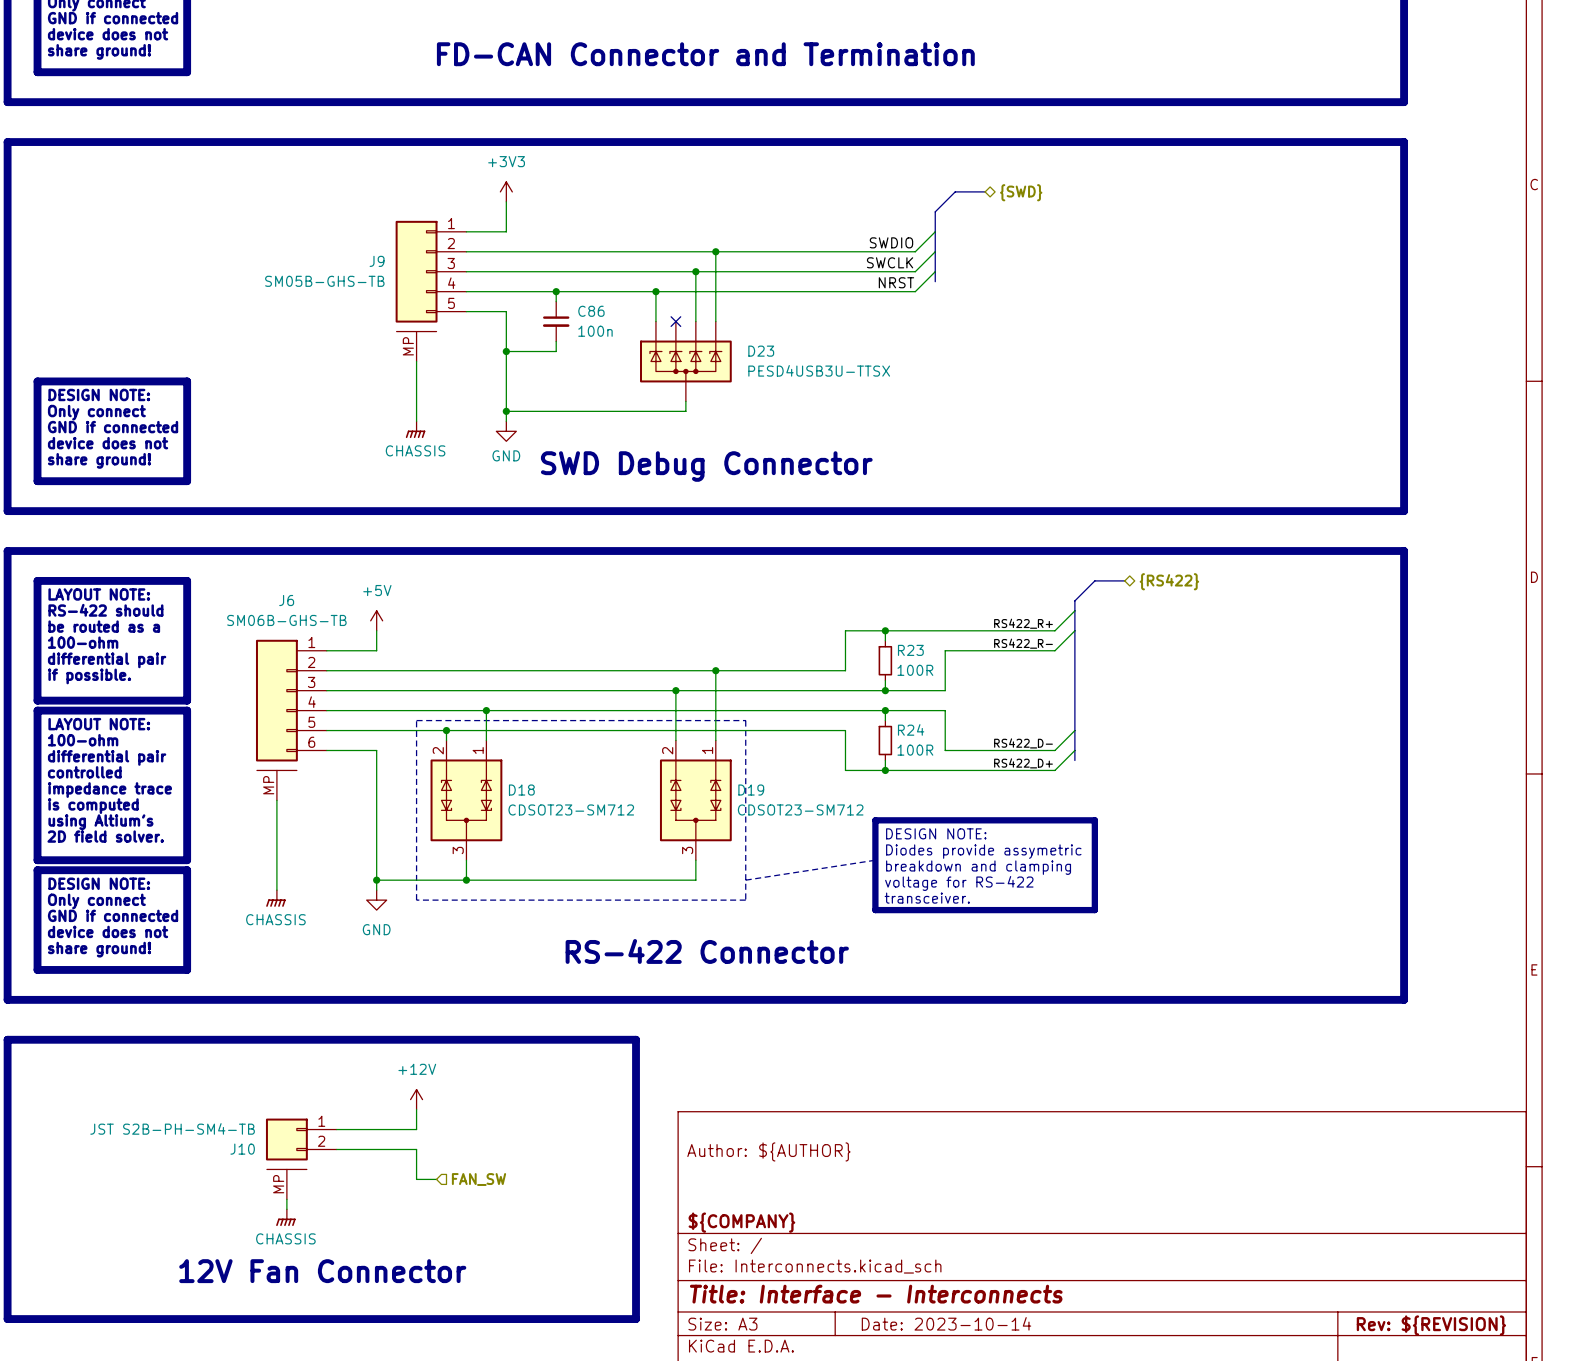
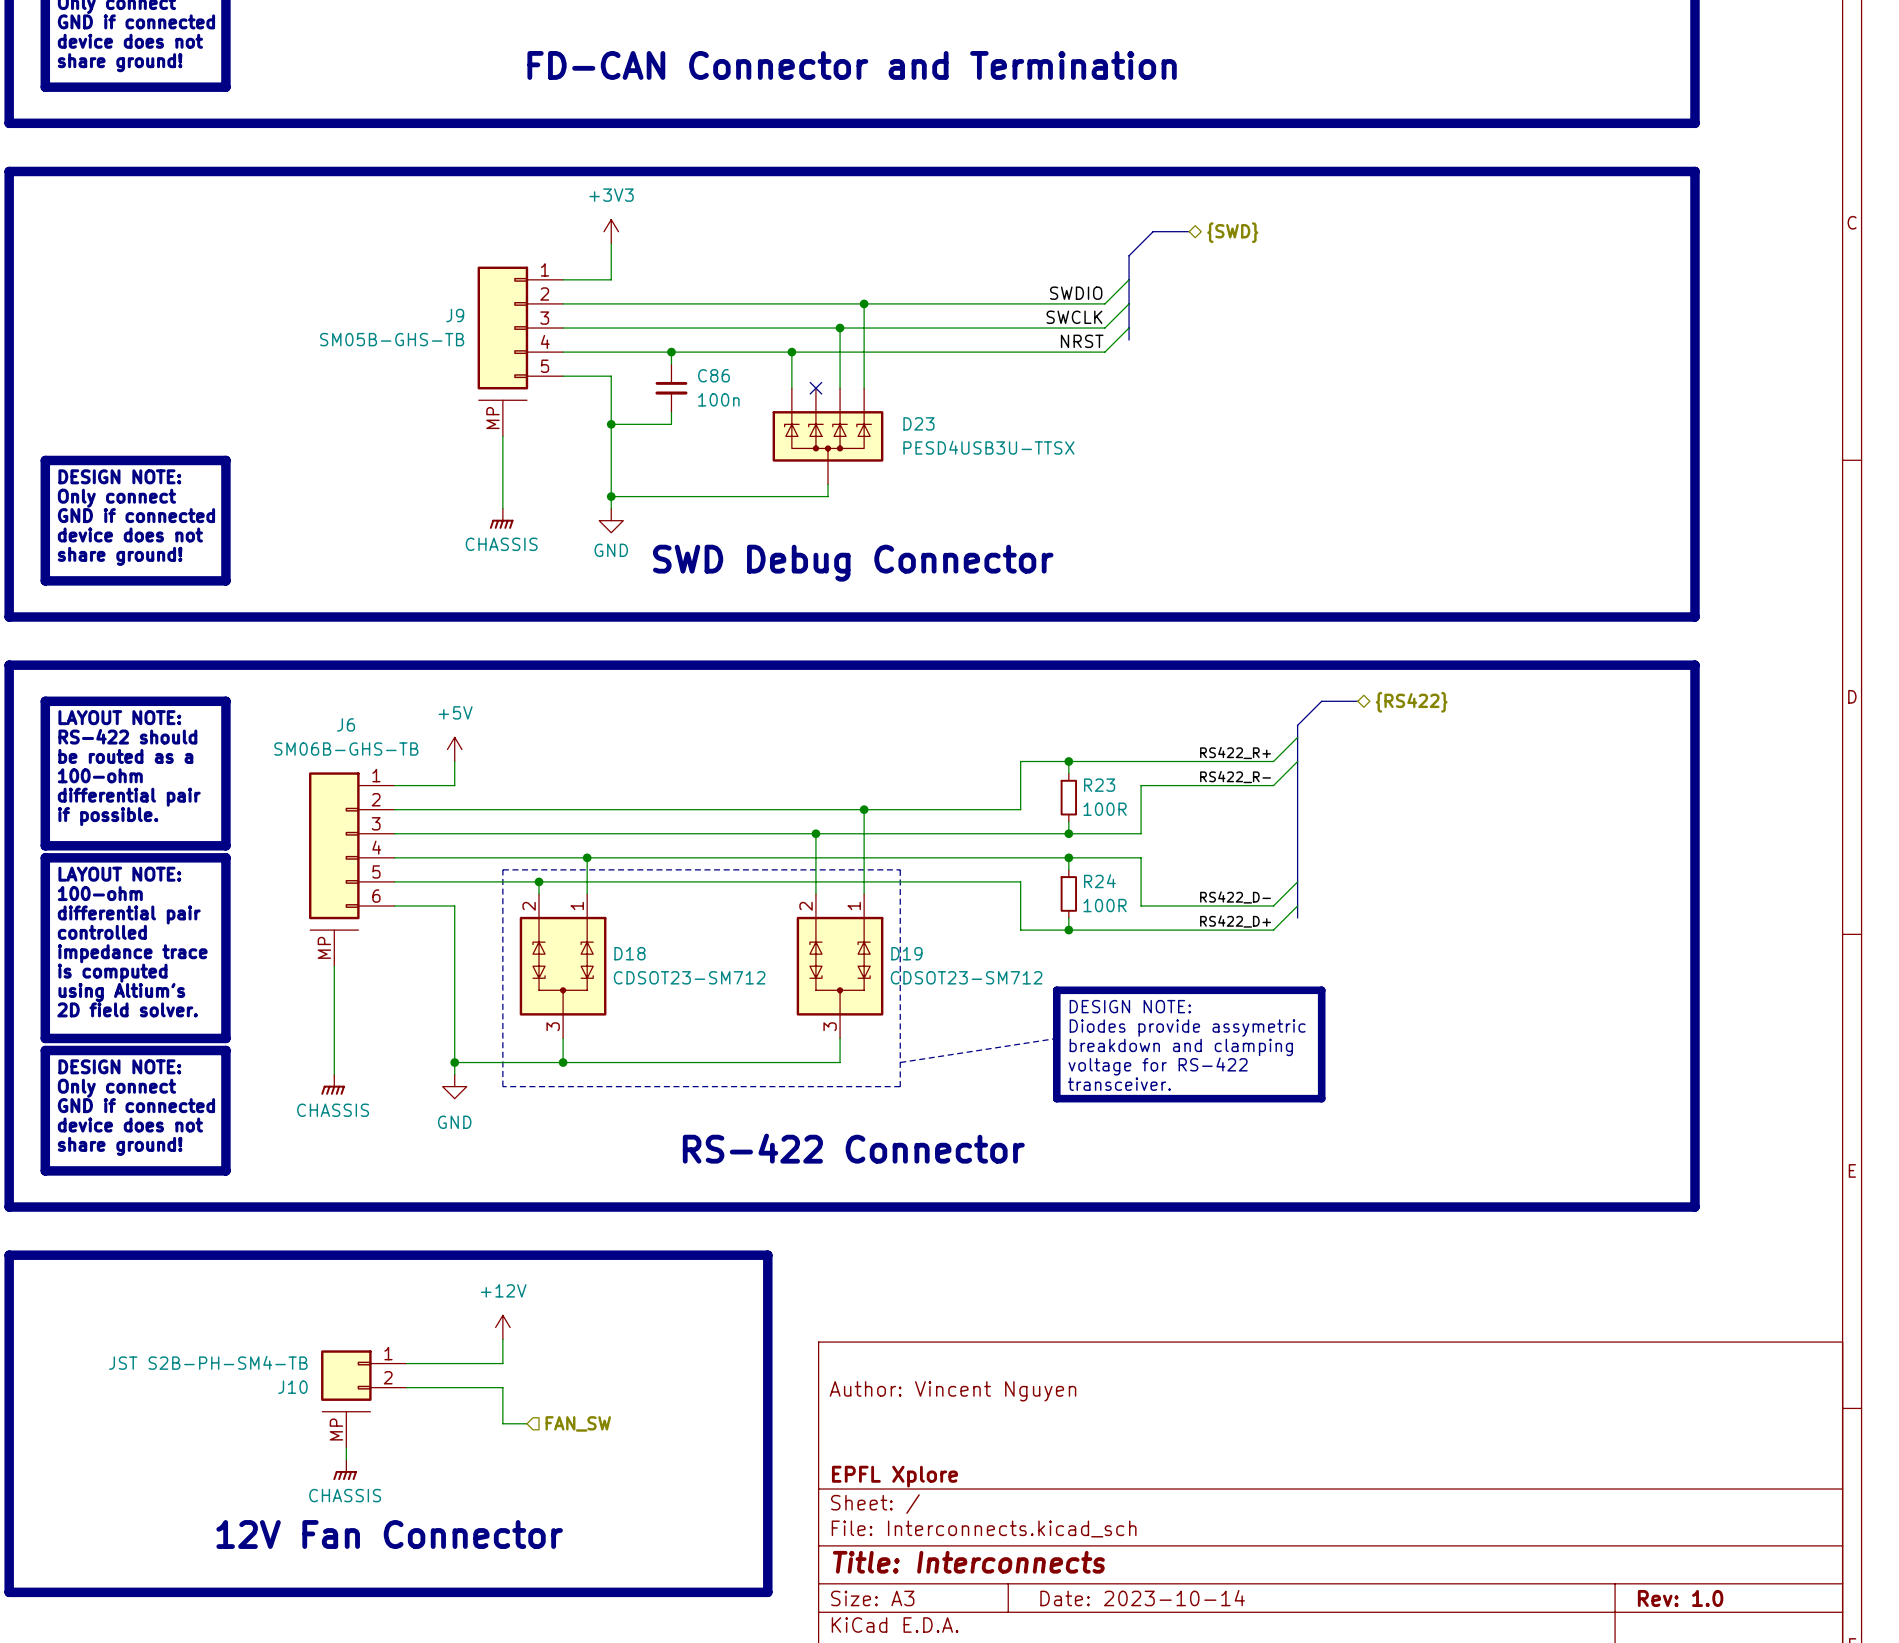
title block: Author: ${AUTHOR} (768, 1151) -> Author: Vincent Nguyen (952, 1391)
title block: ${COMPANY} (741, 1222) -> EPFL Xplore (894, 1476)
title block: Title: Interface - Interconnects (876, 1294) -> Title: Interconnects (968, 1562)
title block: Rev: ${REVISION} (1431, 1325) -> Rev: 1.0 (1680, 1598)

